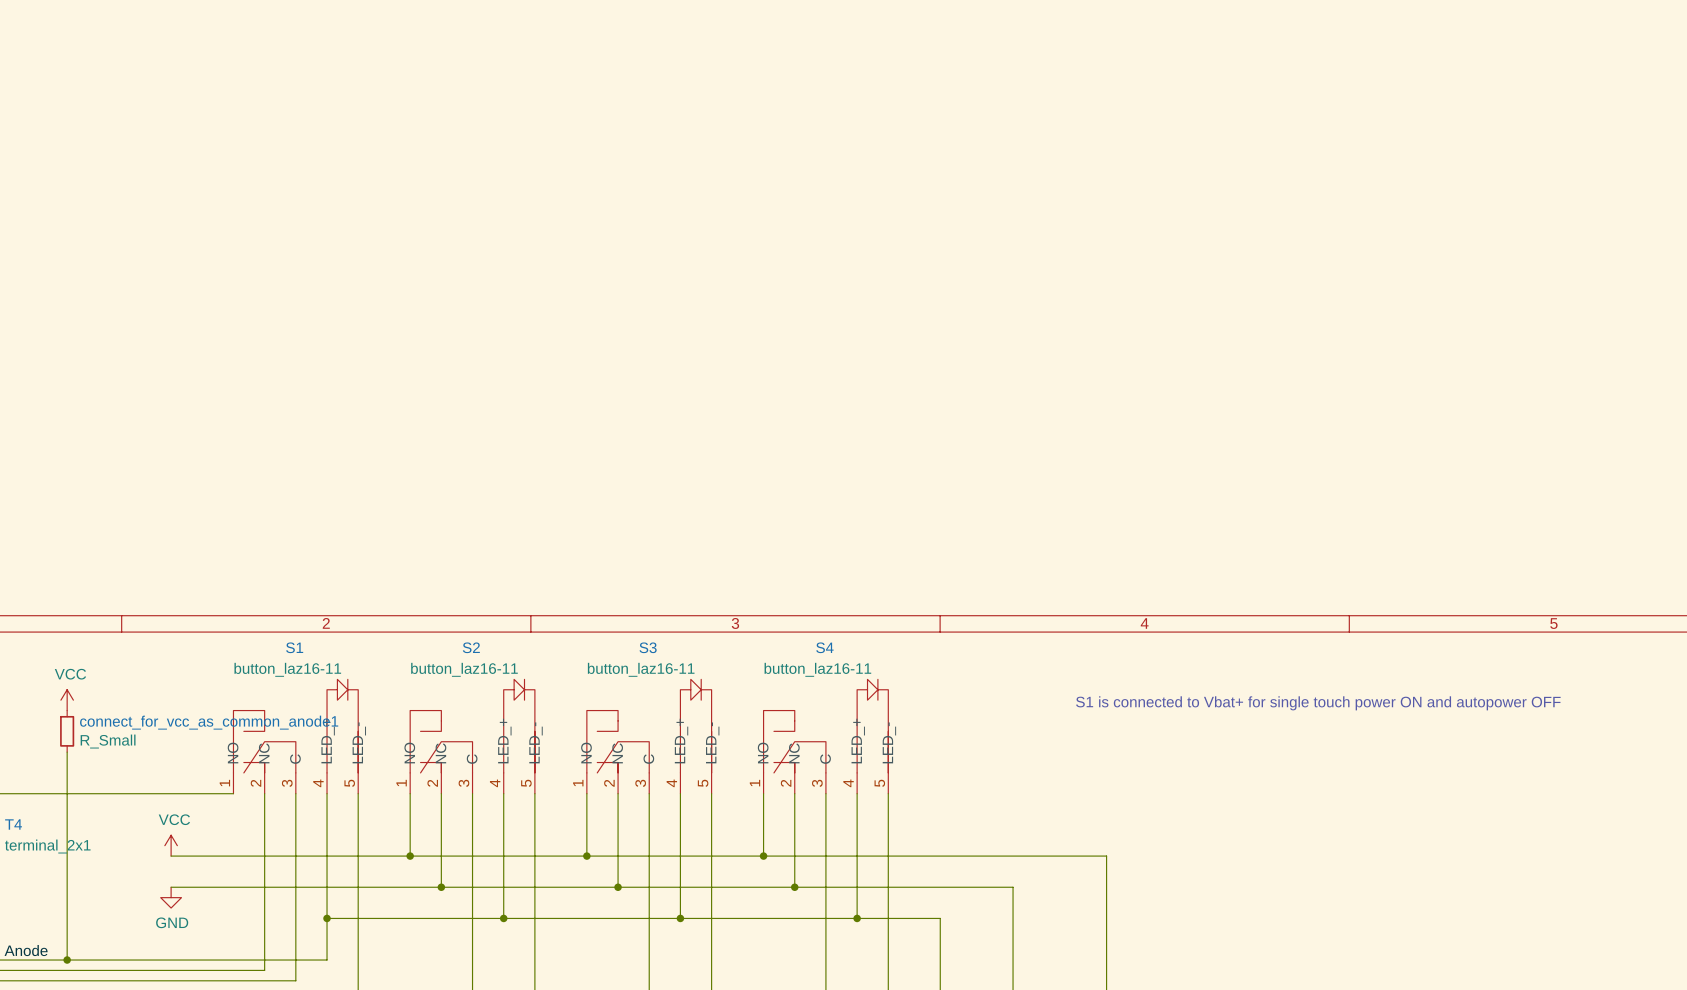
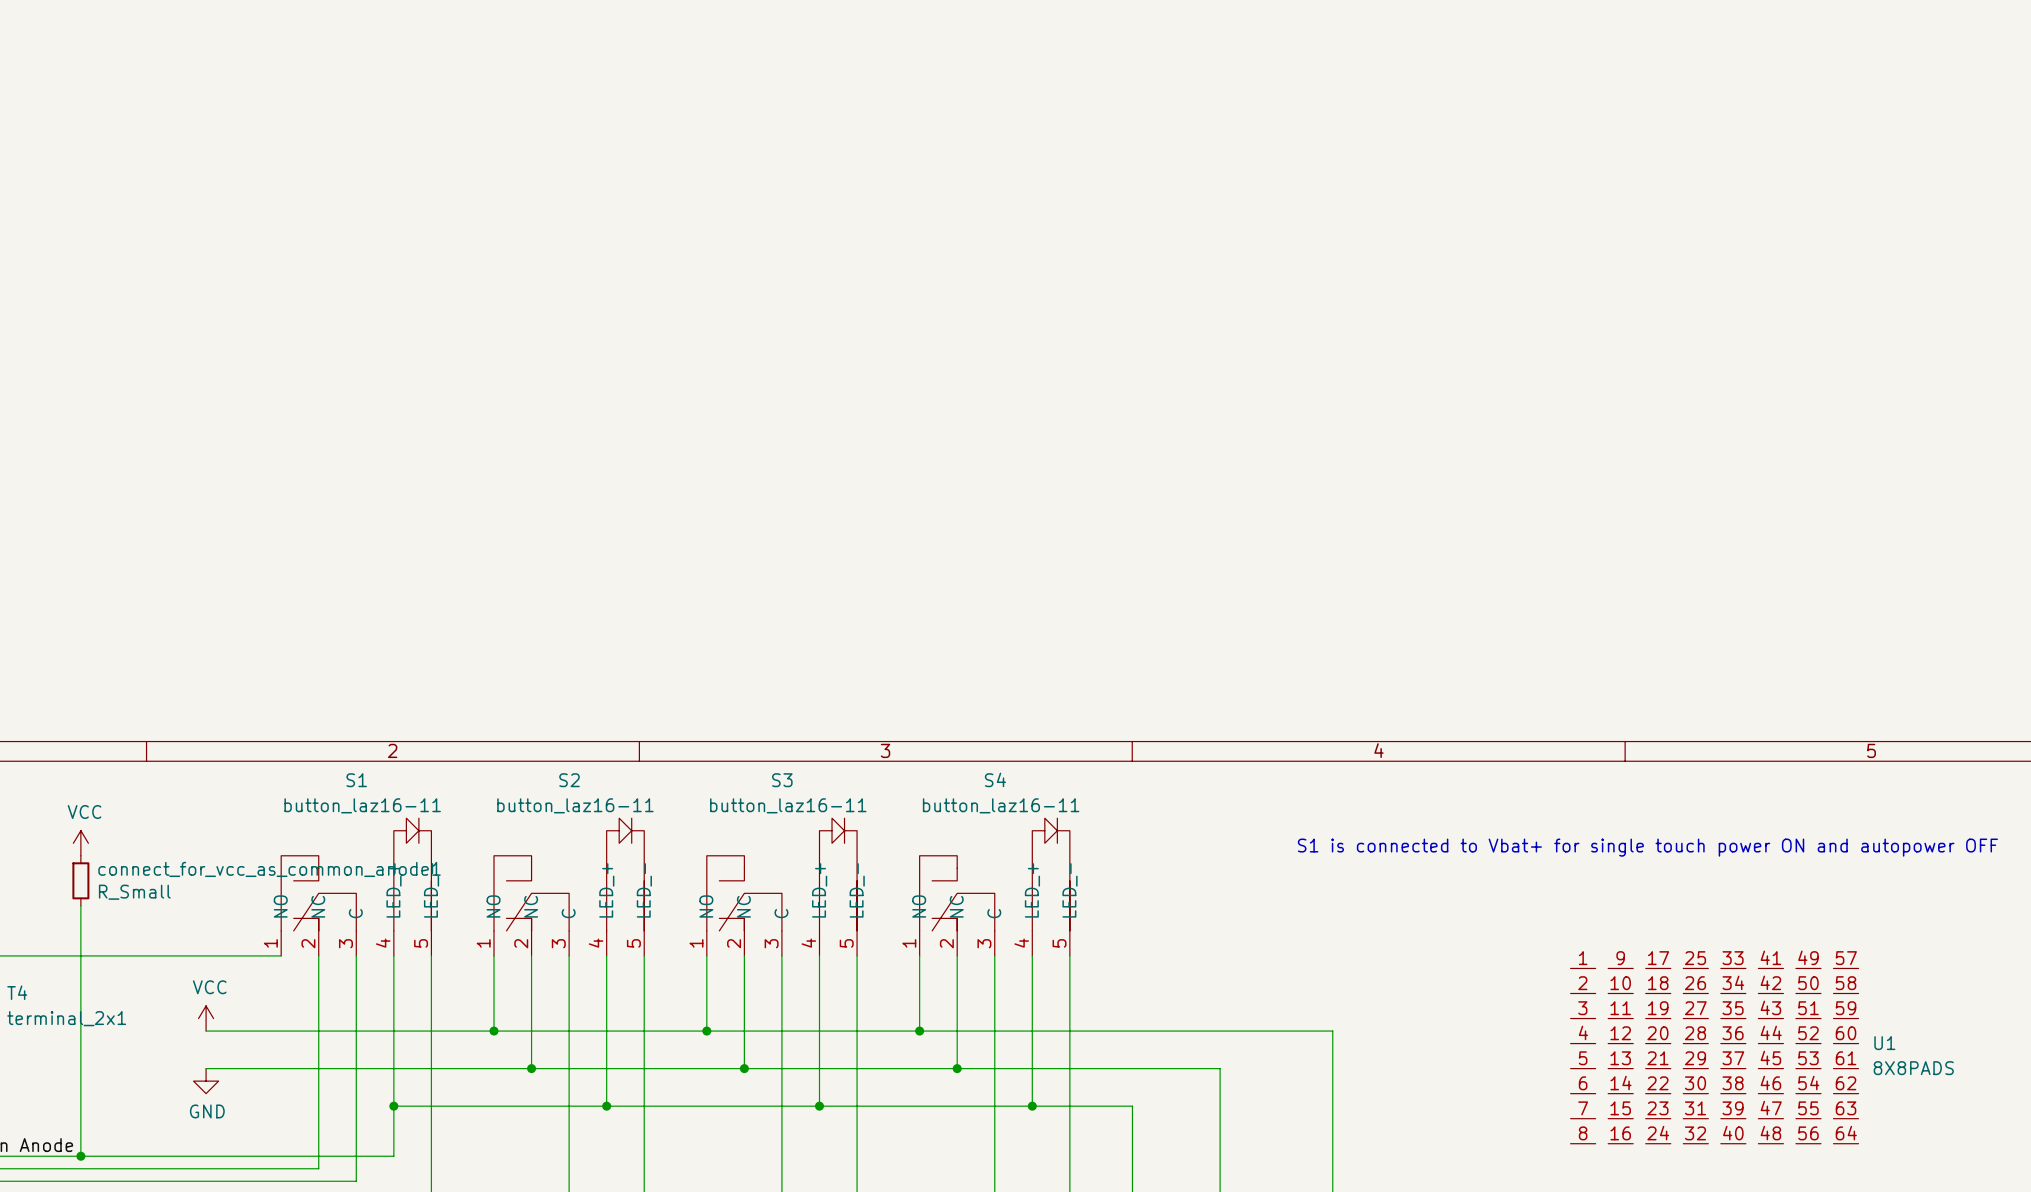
U1: none -> 8X8PADS (1714, 1056)

